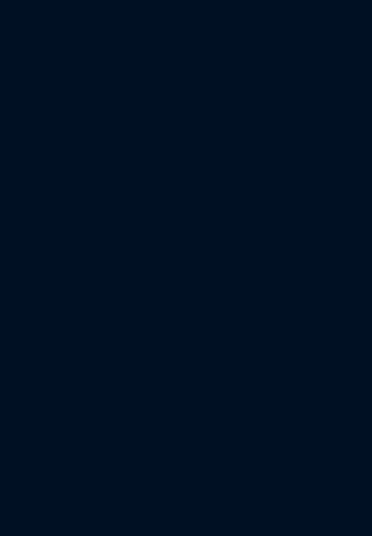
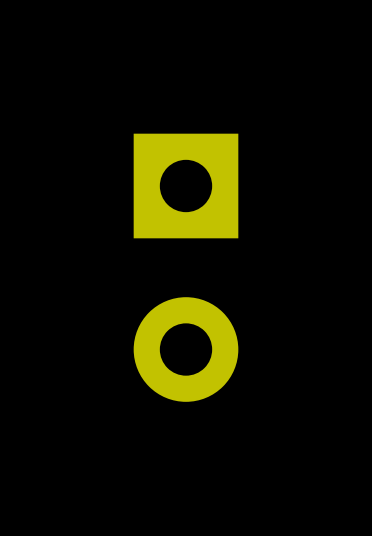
part: none -> (186, 267)

